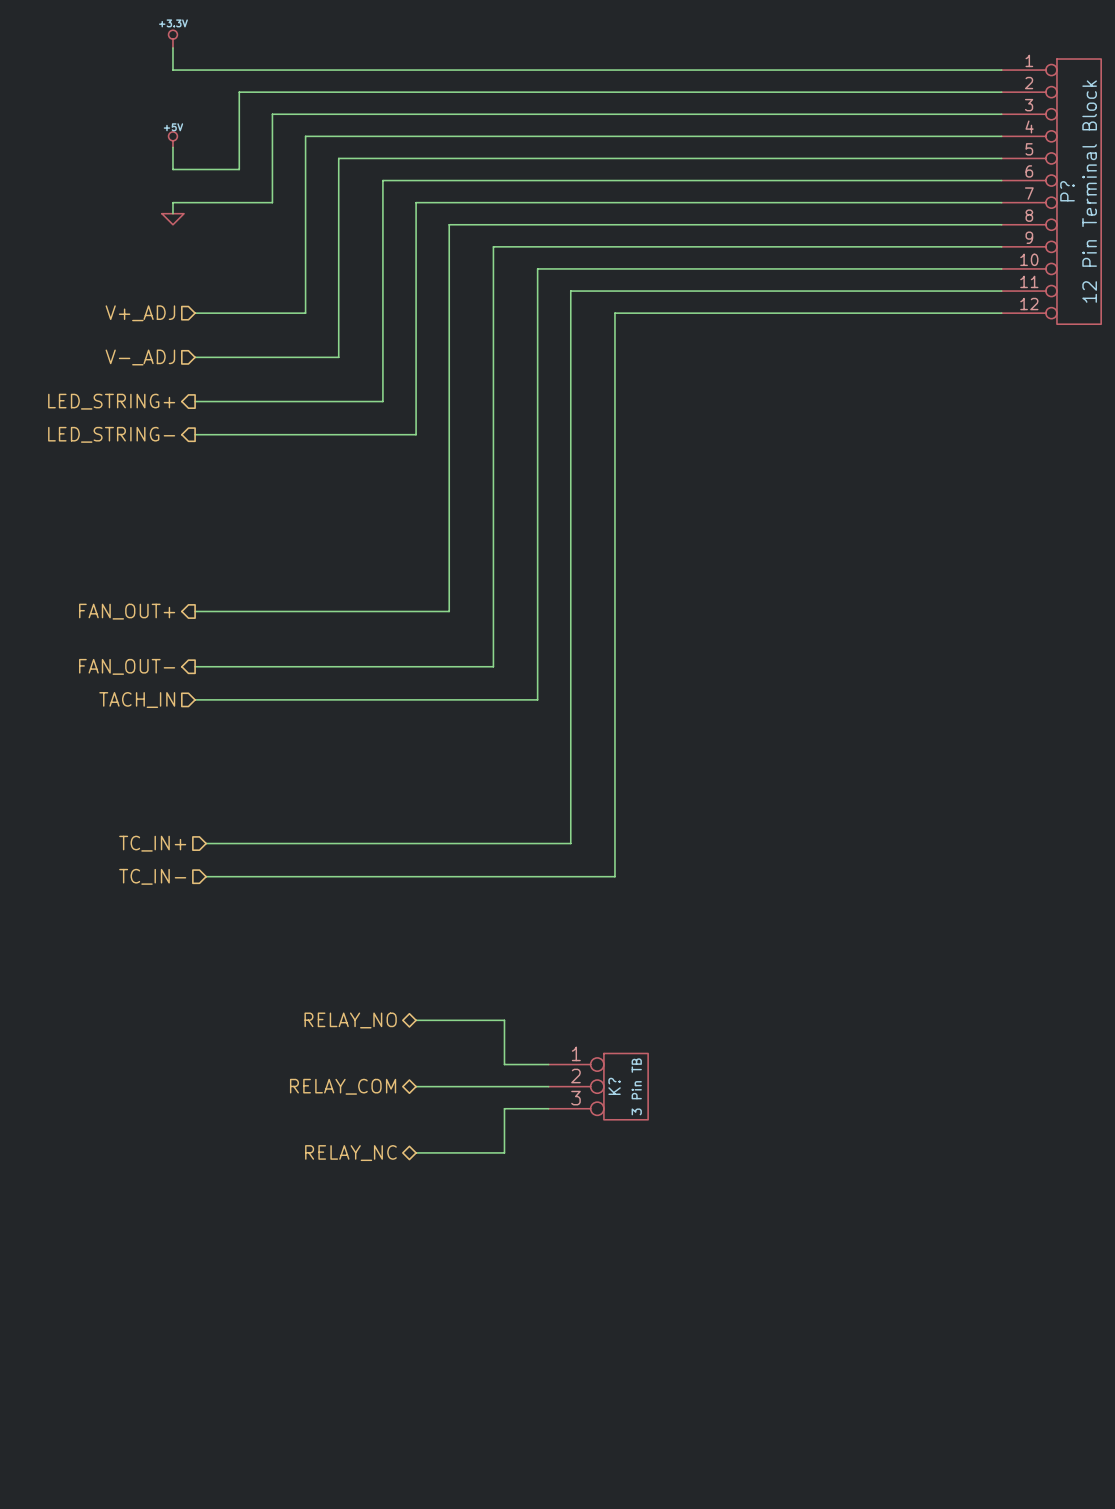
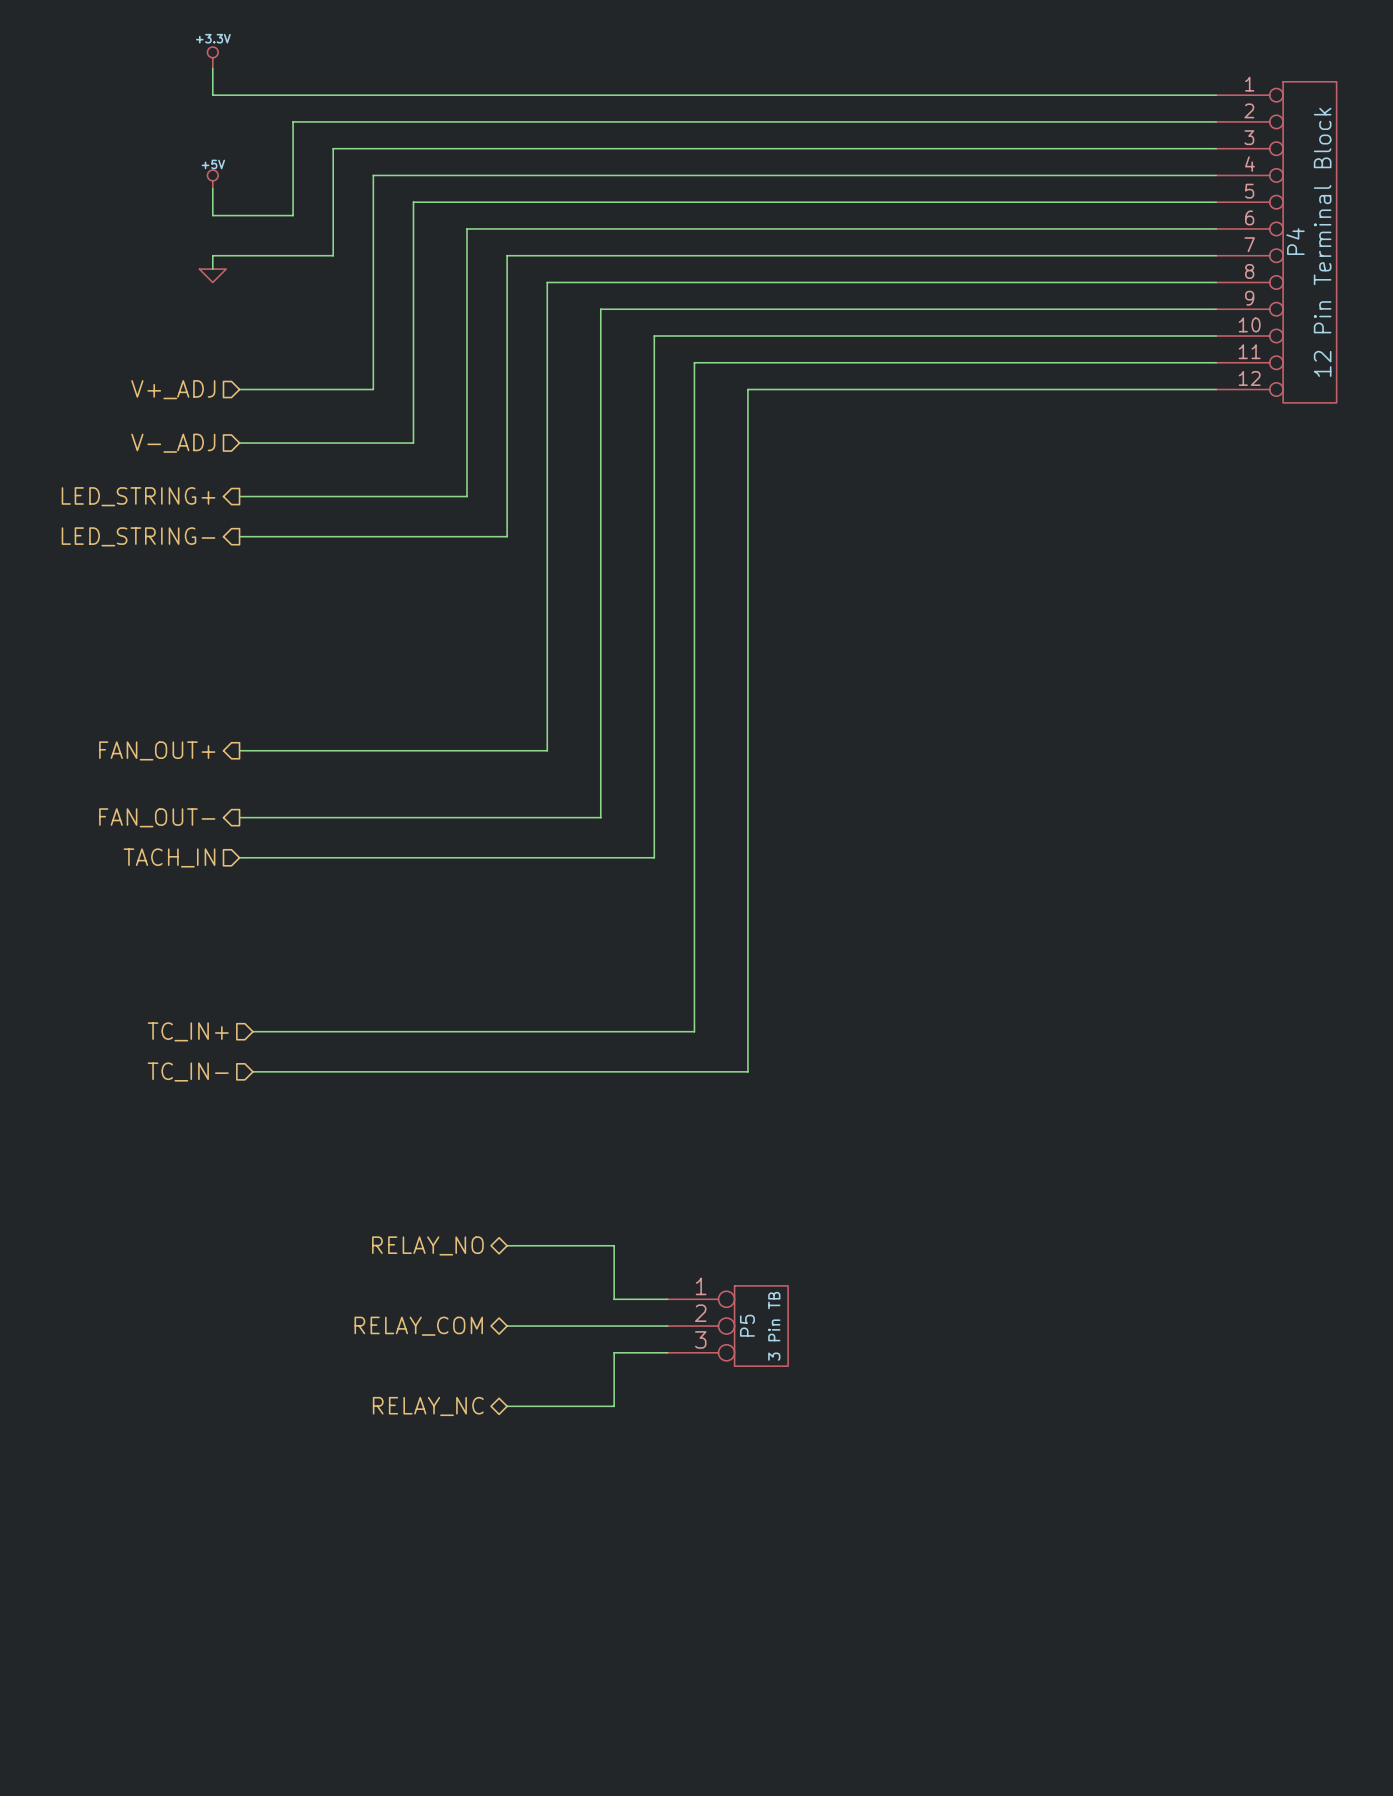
P? name: P? (1067, 191) -> P4 (1295, 241)
K? name: K? (614, 1086) -> P5 (747, 1325)

